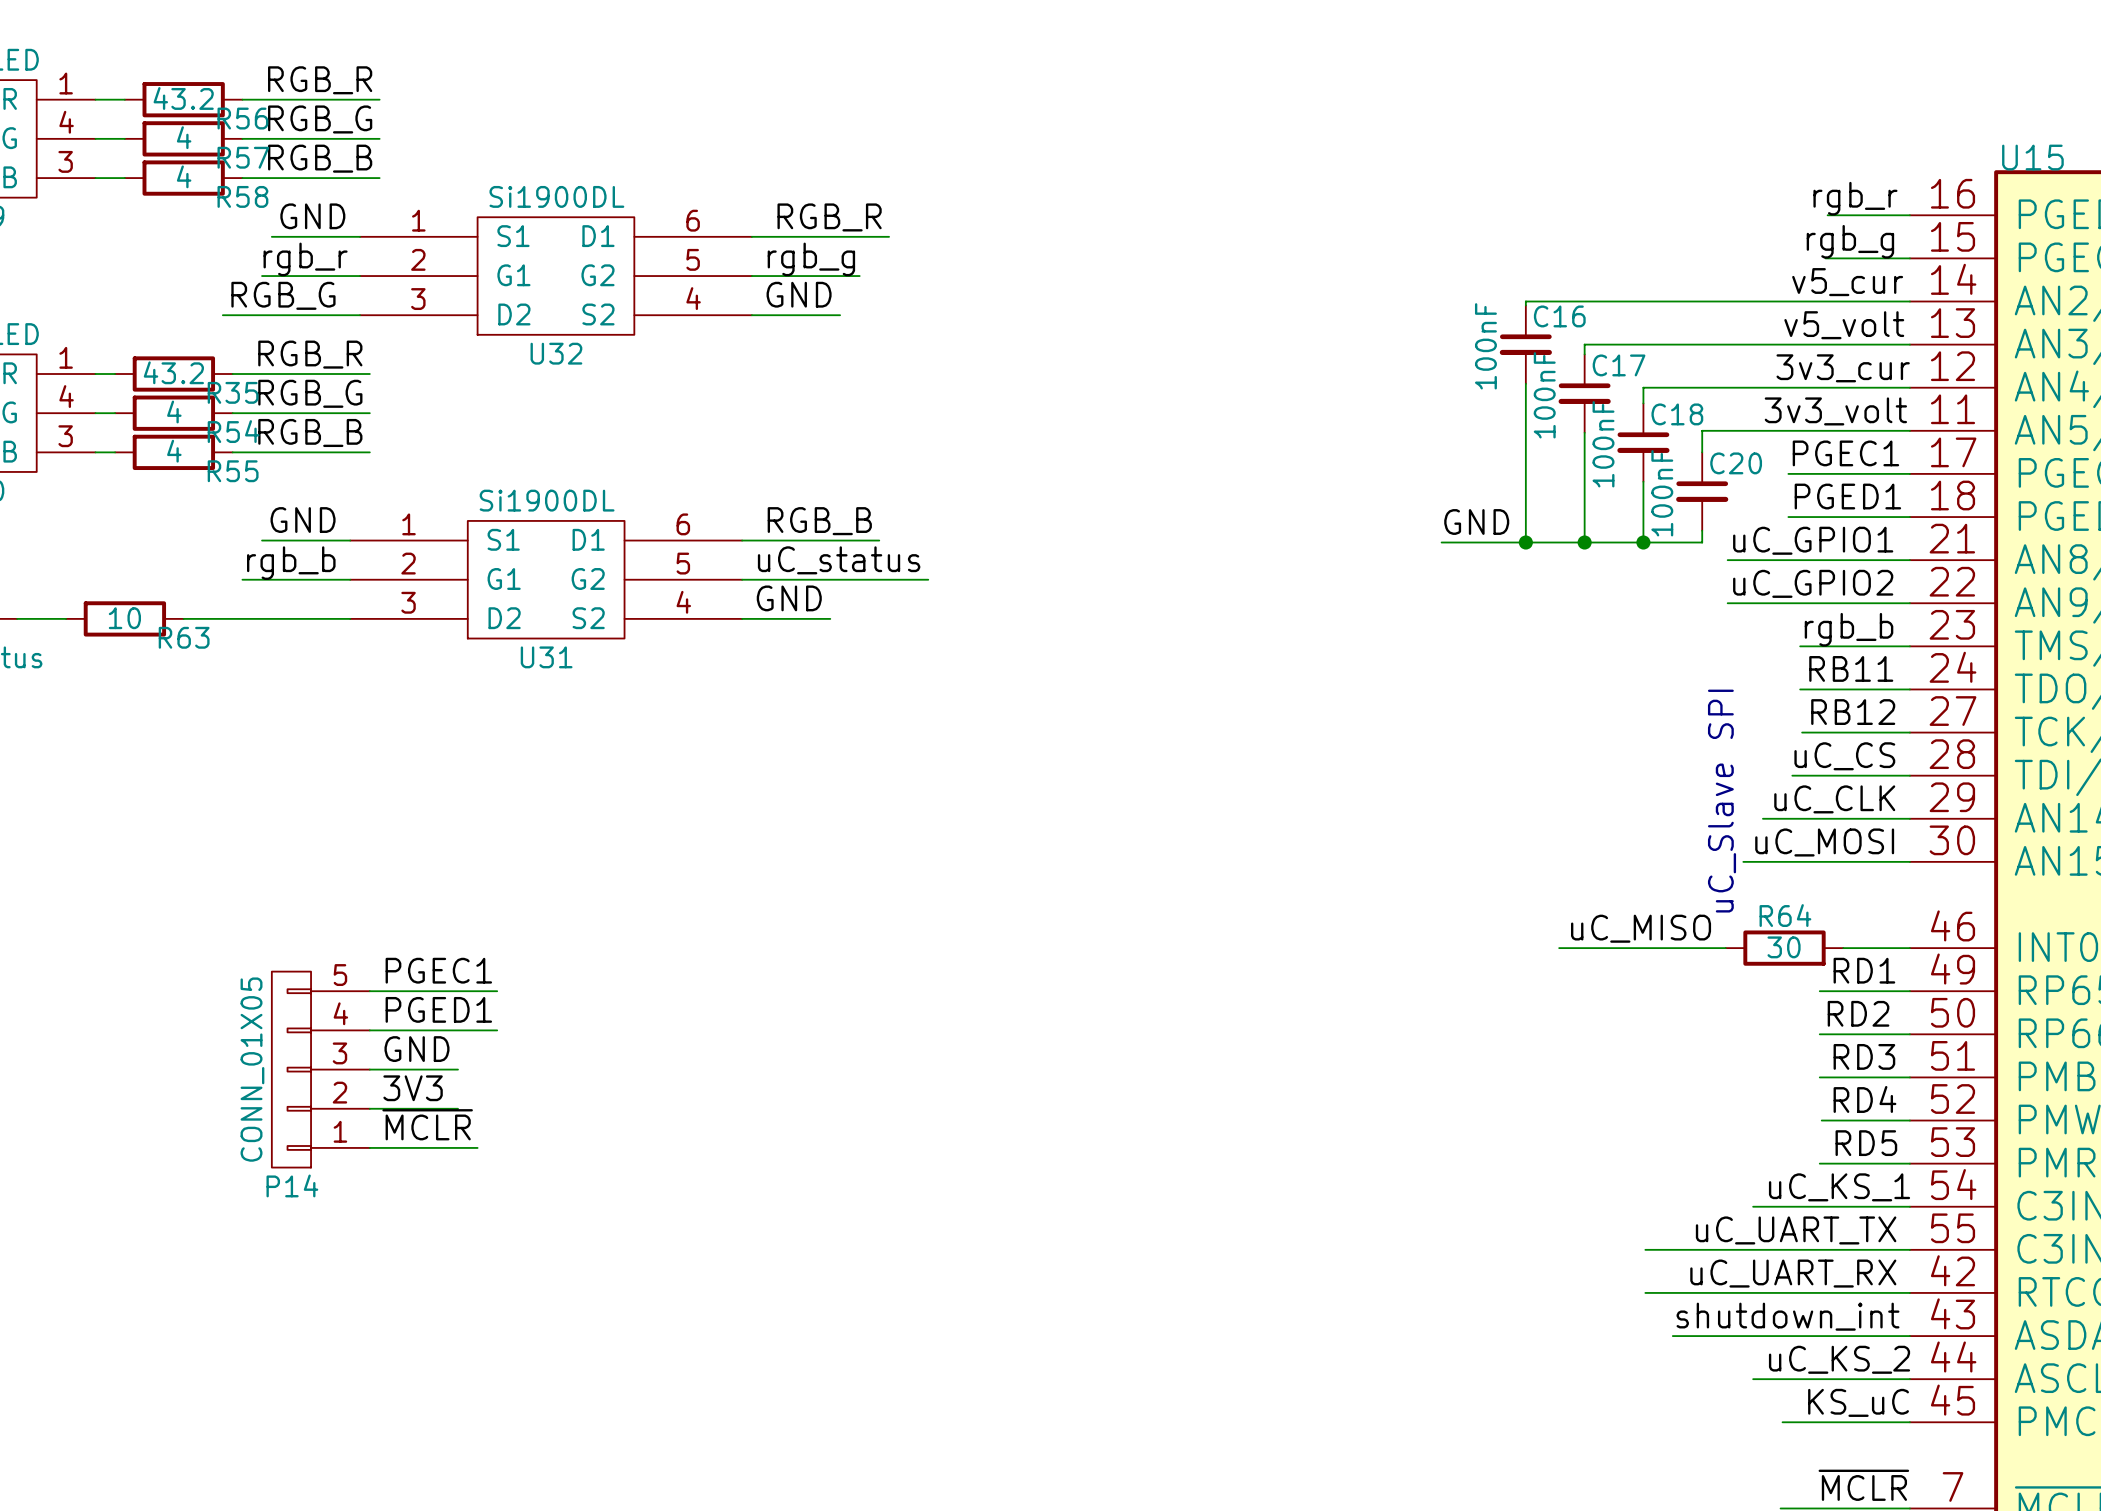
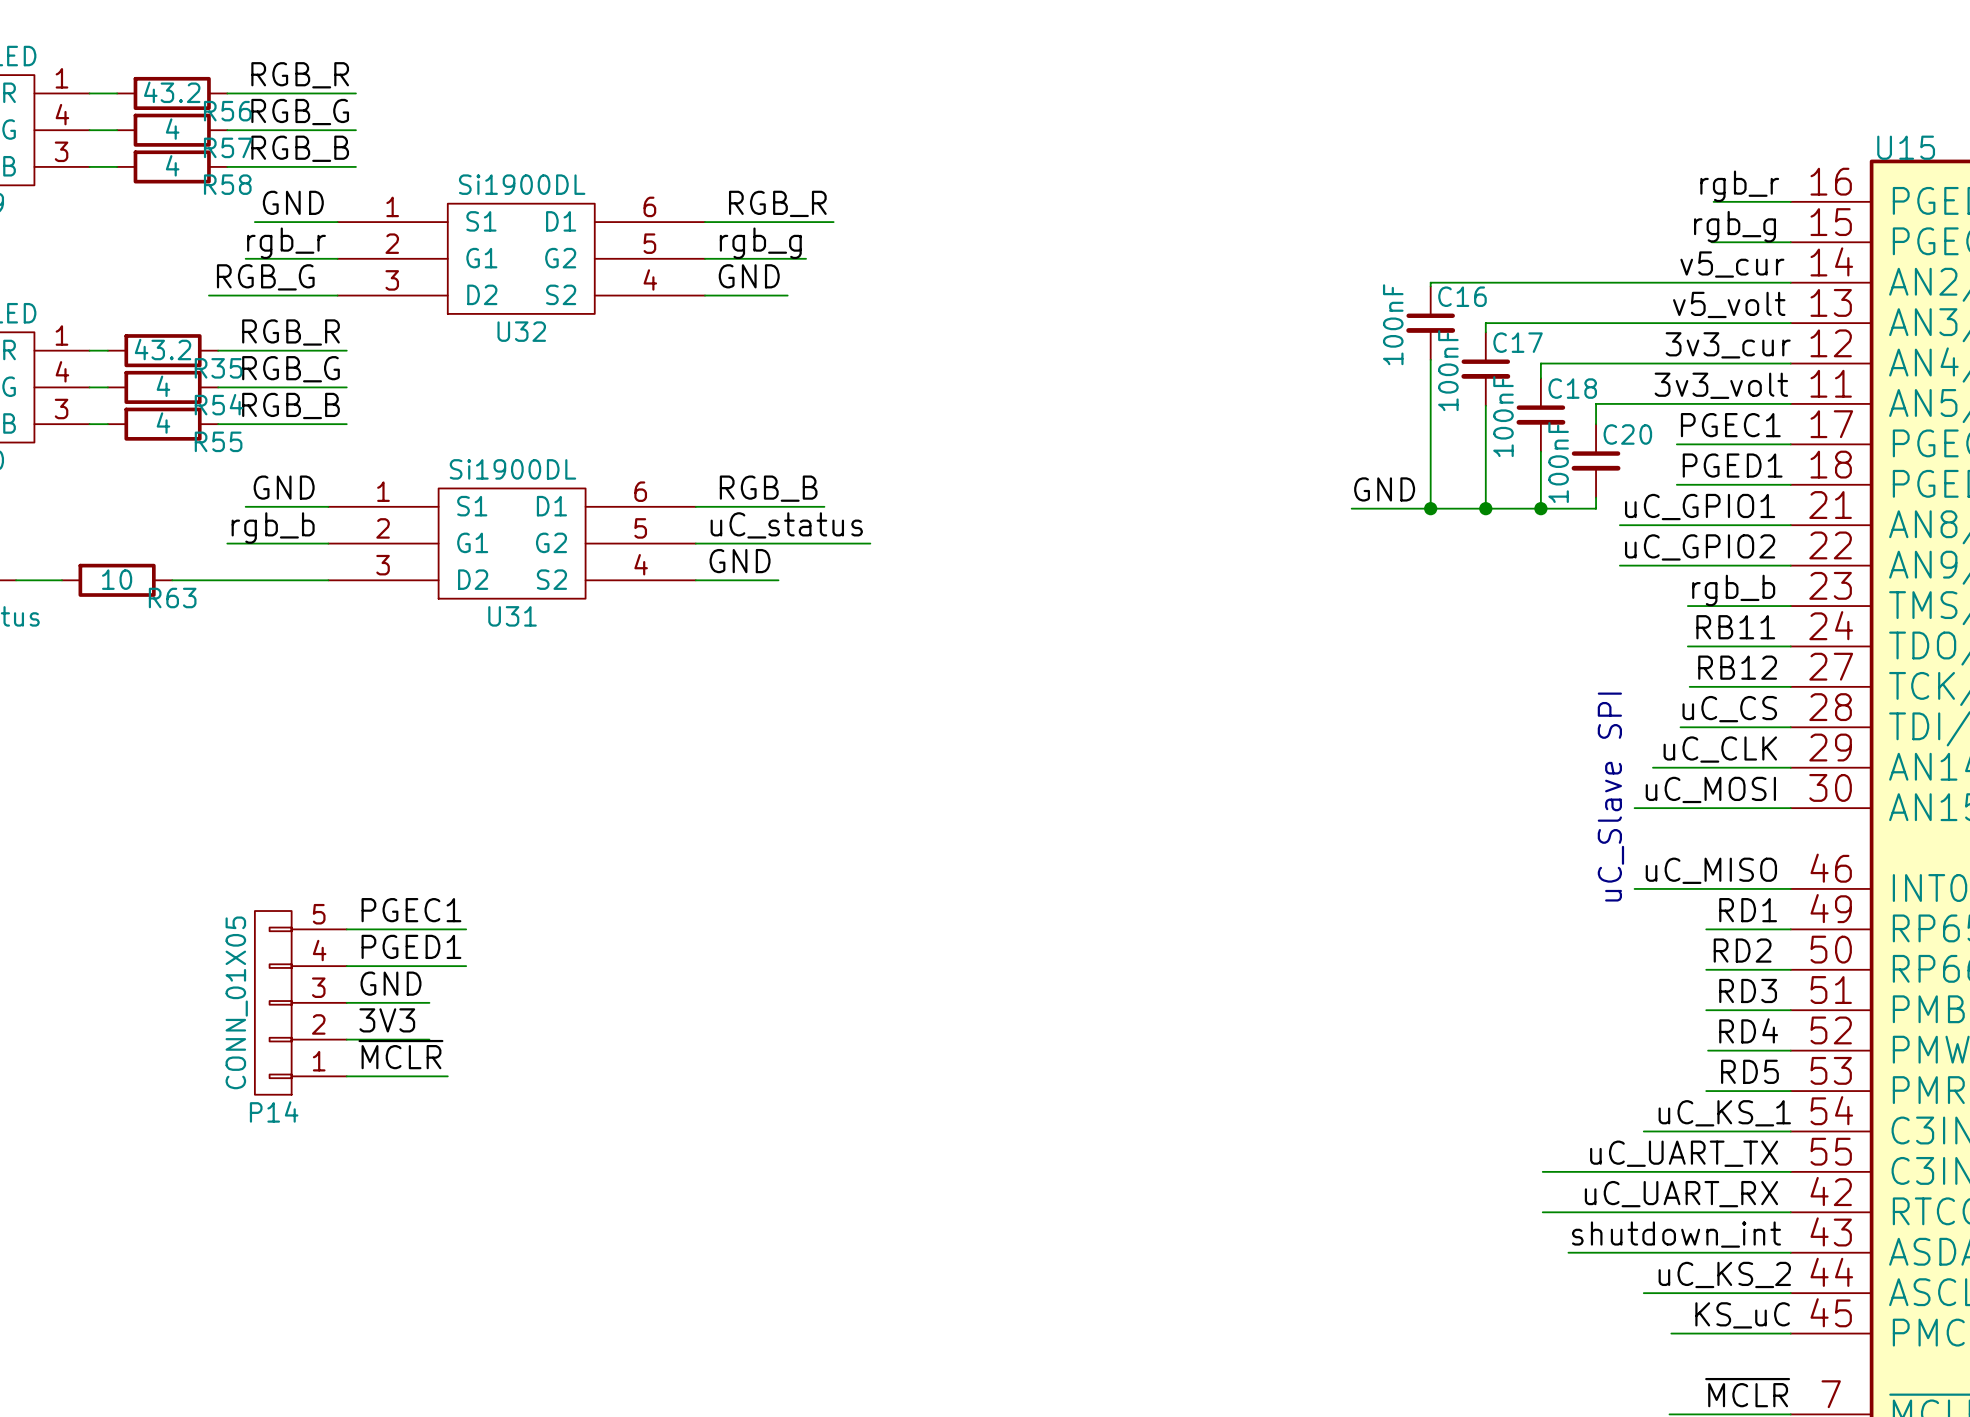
text position: uC_Slave SPI (1722, 801) -> uC_Slave SPI (1610, 797)
label position: uC_MISO (1641, 928) -> uC_MISO (1711, 870)
wire: (1559, 948) (1725, 948) -> none
wire: none -> (1634, 888) (1728, 888)
R64: 30 (1784, 948) -> none

